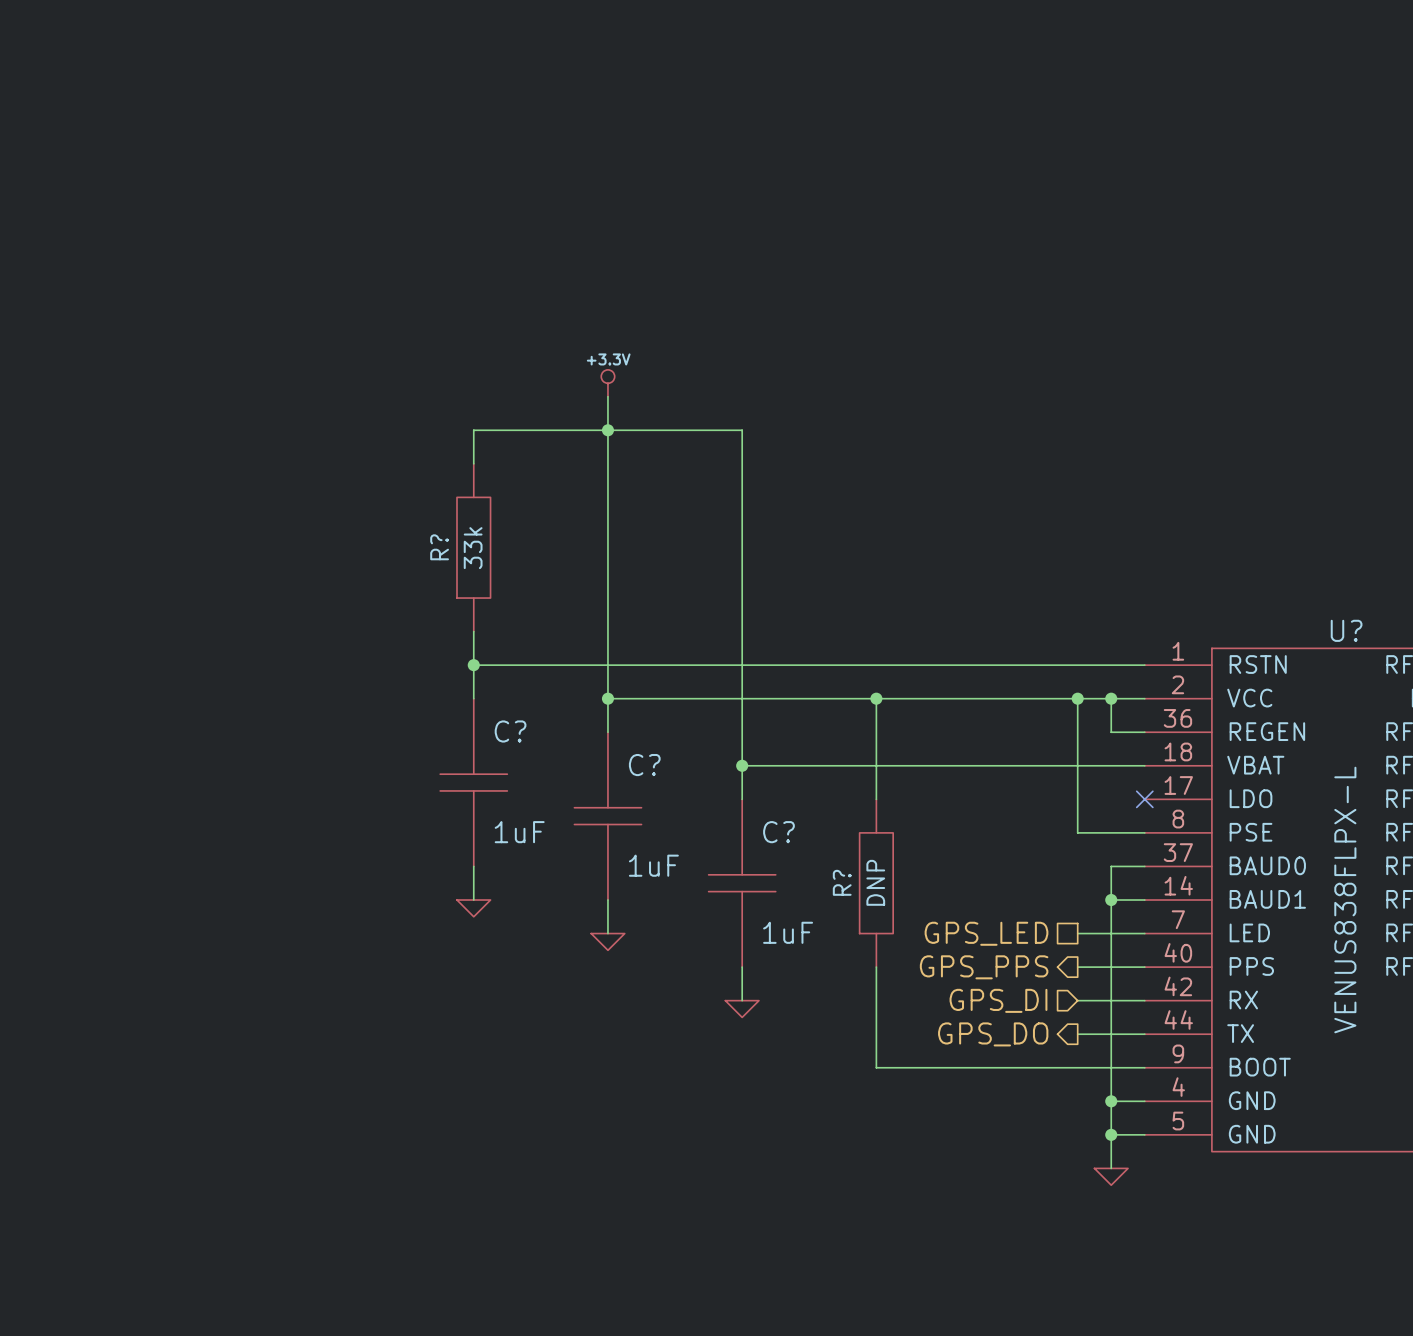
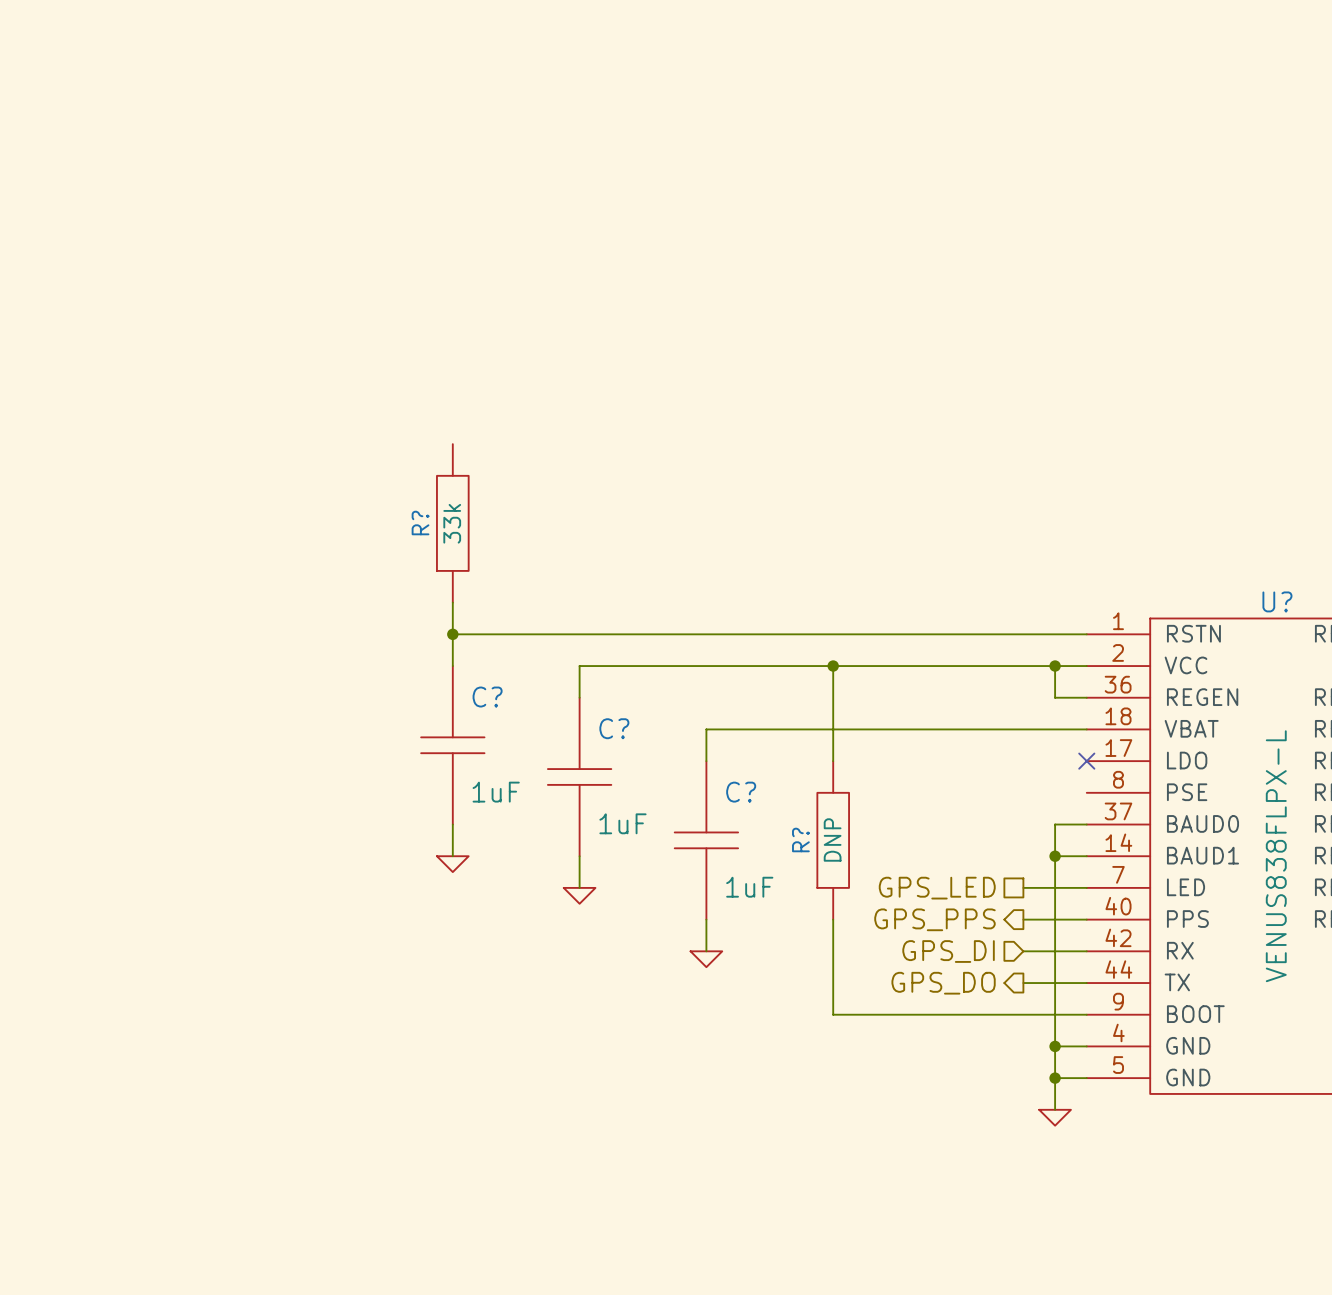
power symbol: +3.3V (607, 383) -> none
wire: (607, 396) (607, 698) -> none
junction: (607, 430) -> none
wire: (473, 463) (473, 430) (742, 430) (742, 765) -> none
junction: (607, 698) -> none
wire: (1077, 698) (1077, 832) (1144, 832) -> none
junction: (1077, 698) -> none
junction: (742, 765) -> none

